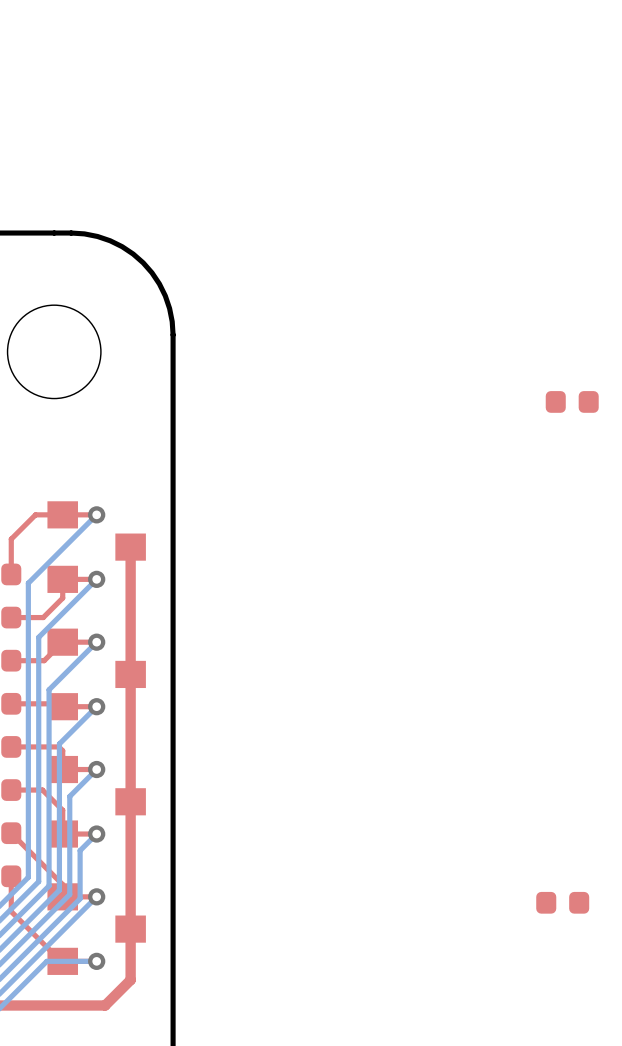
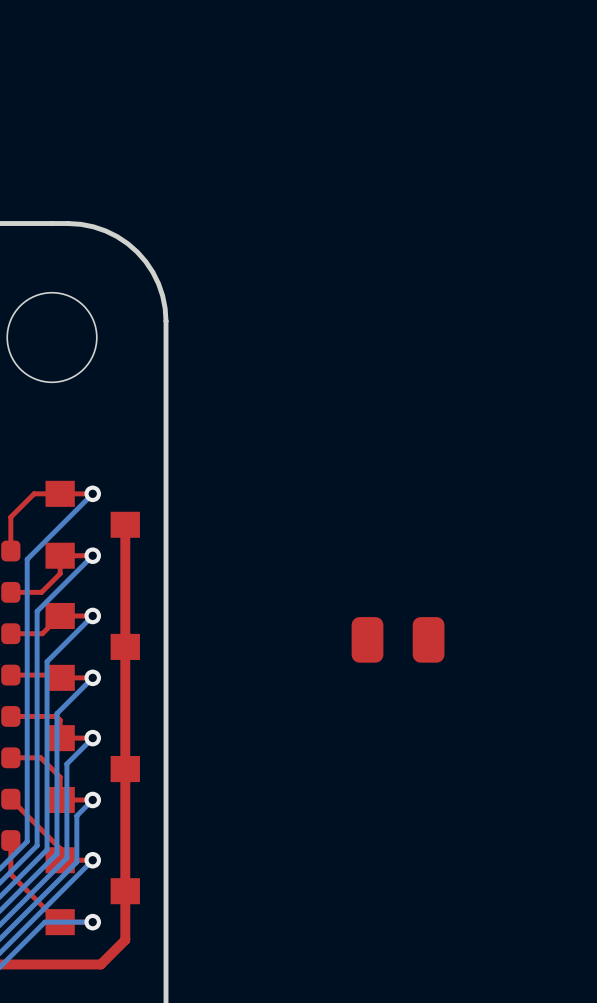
part: (572, 401) -> none
part: none -> (398, 639)
part: (562, 902) -> none

